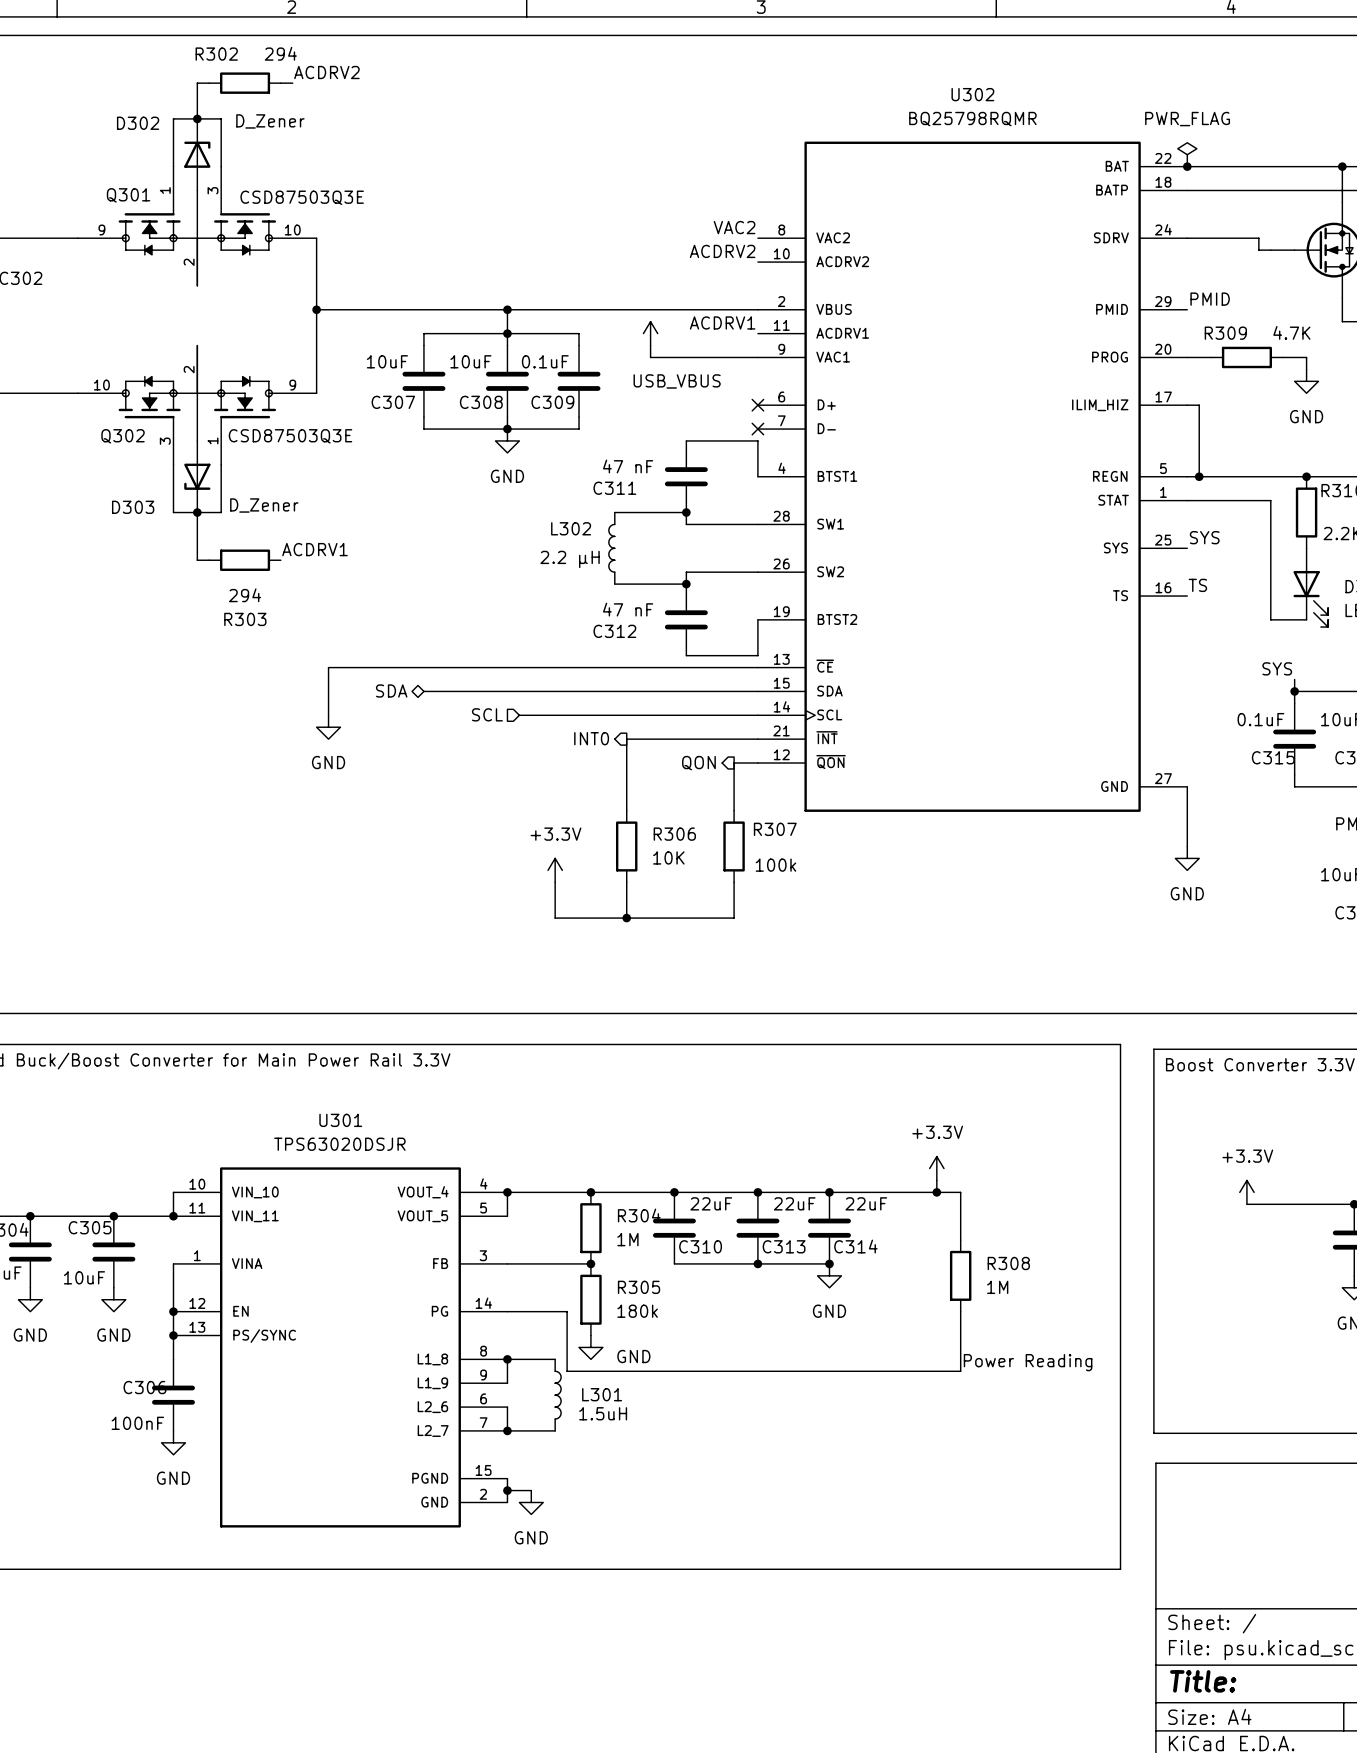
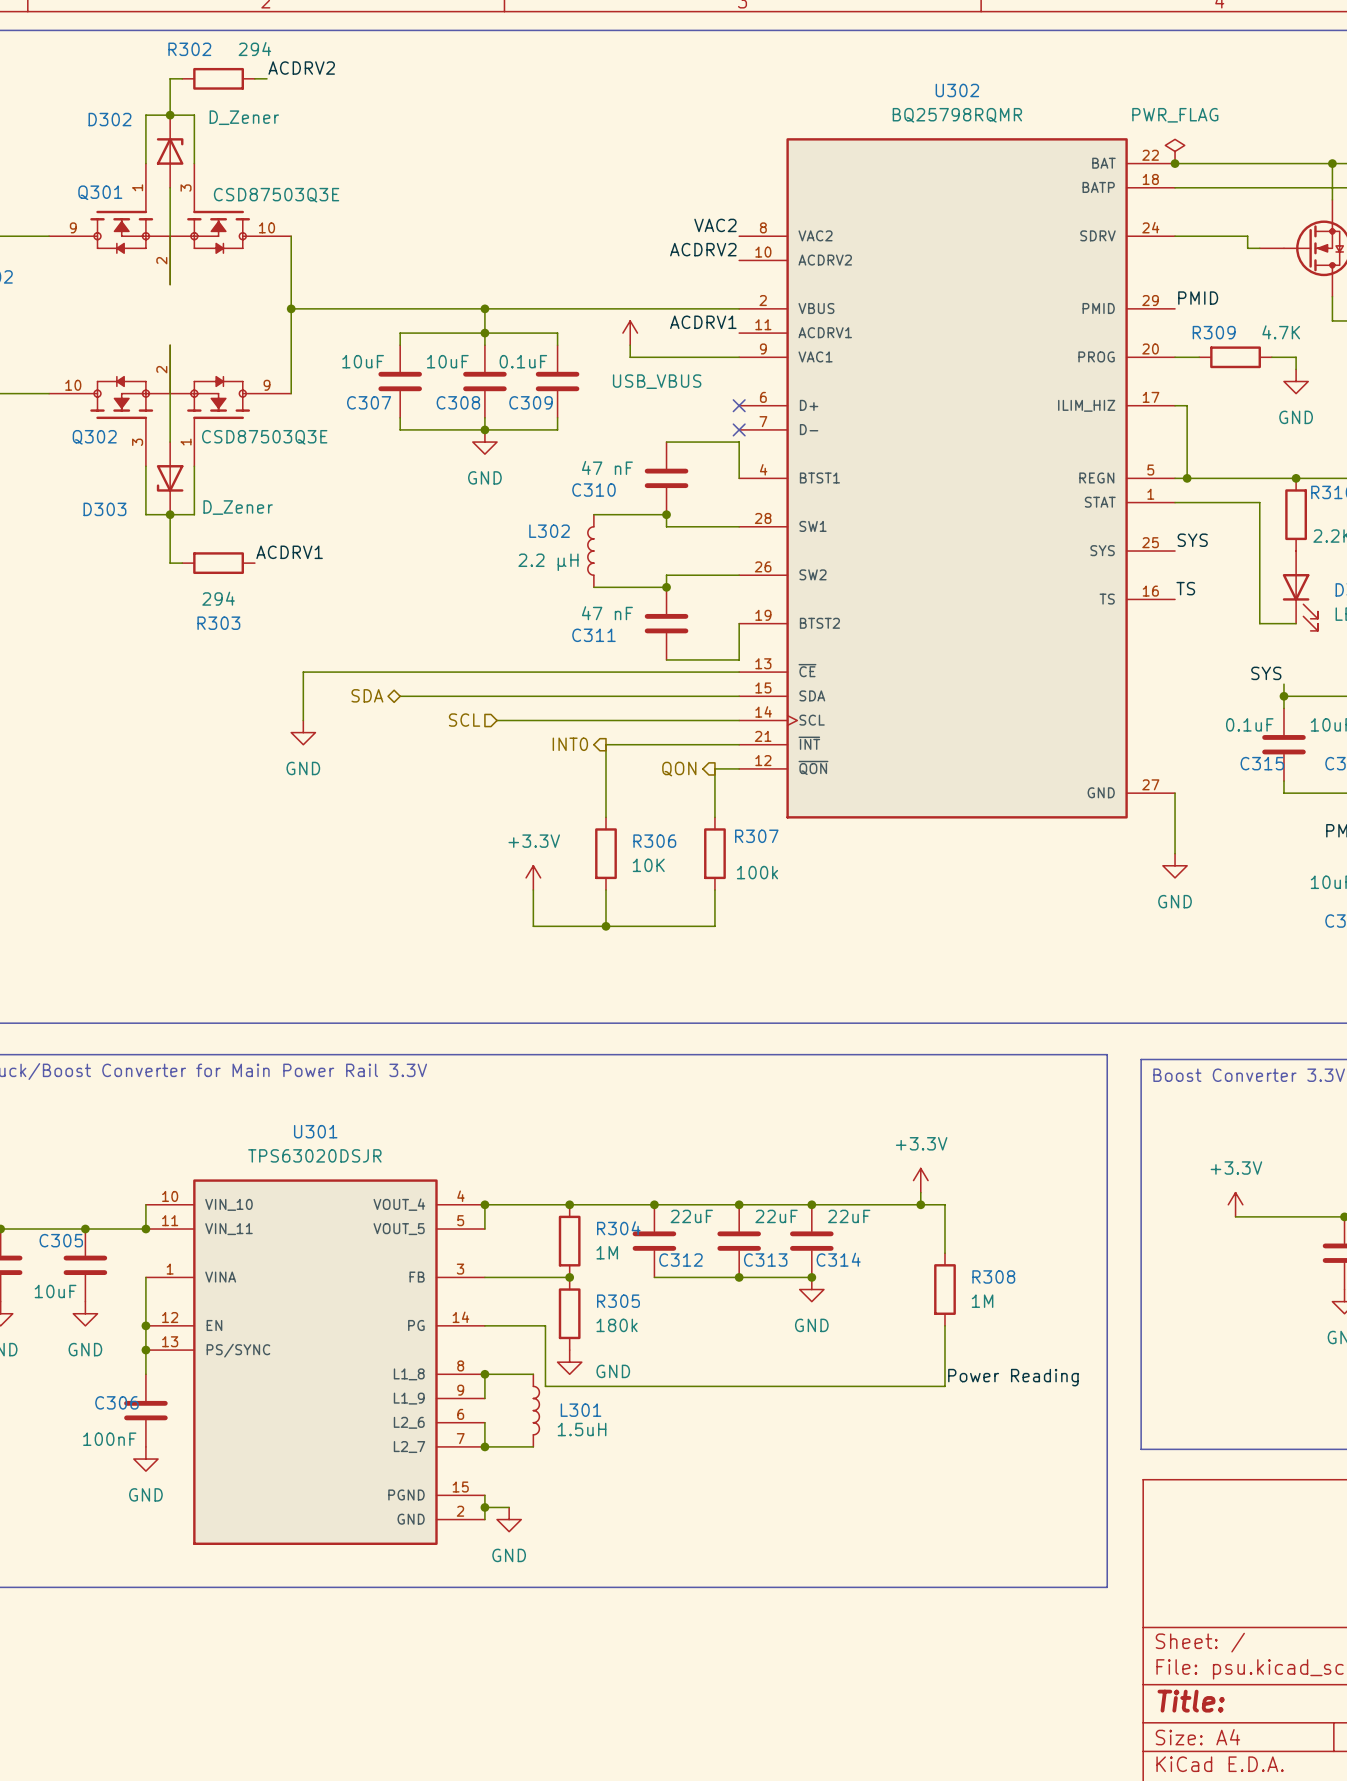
C311 name: C311 (614, 488) -> C310 (593, 490)
C312 name: C312 (614, 631) -> C311 (593, 635)
C310 name: C310 (700, 1246) -> C312 (680, 1260)

